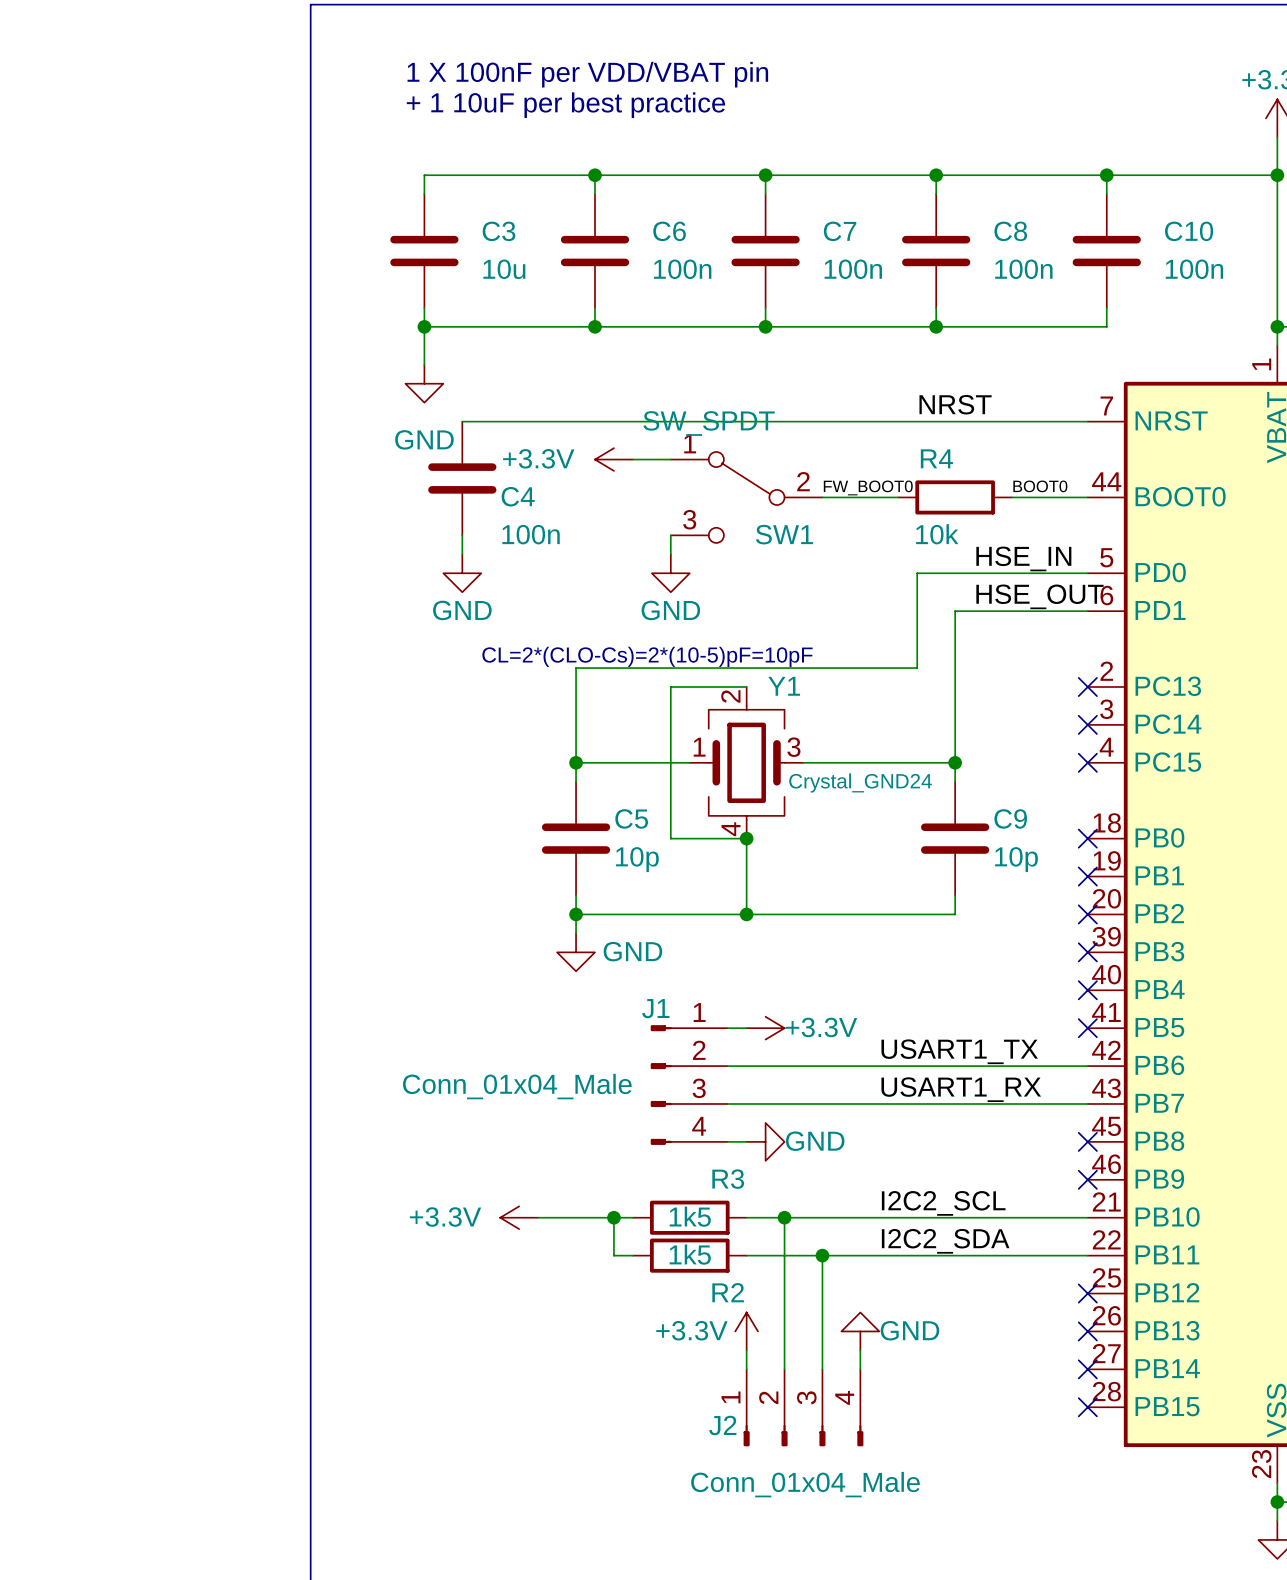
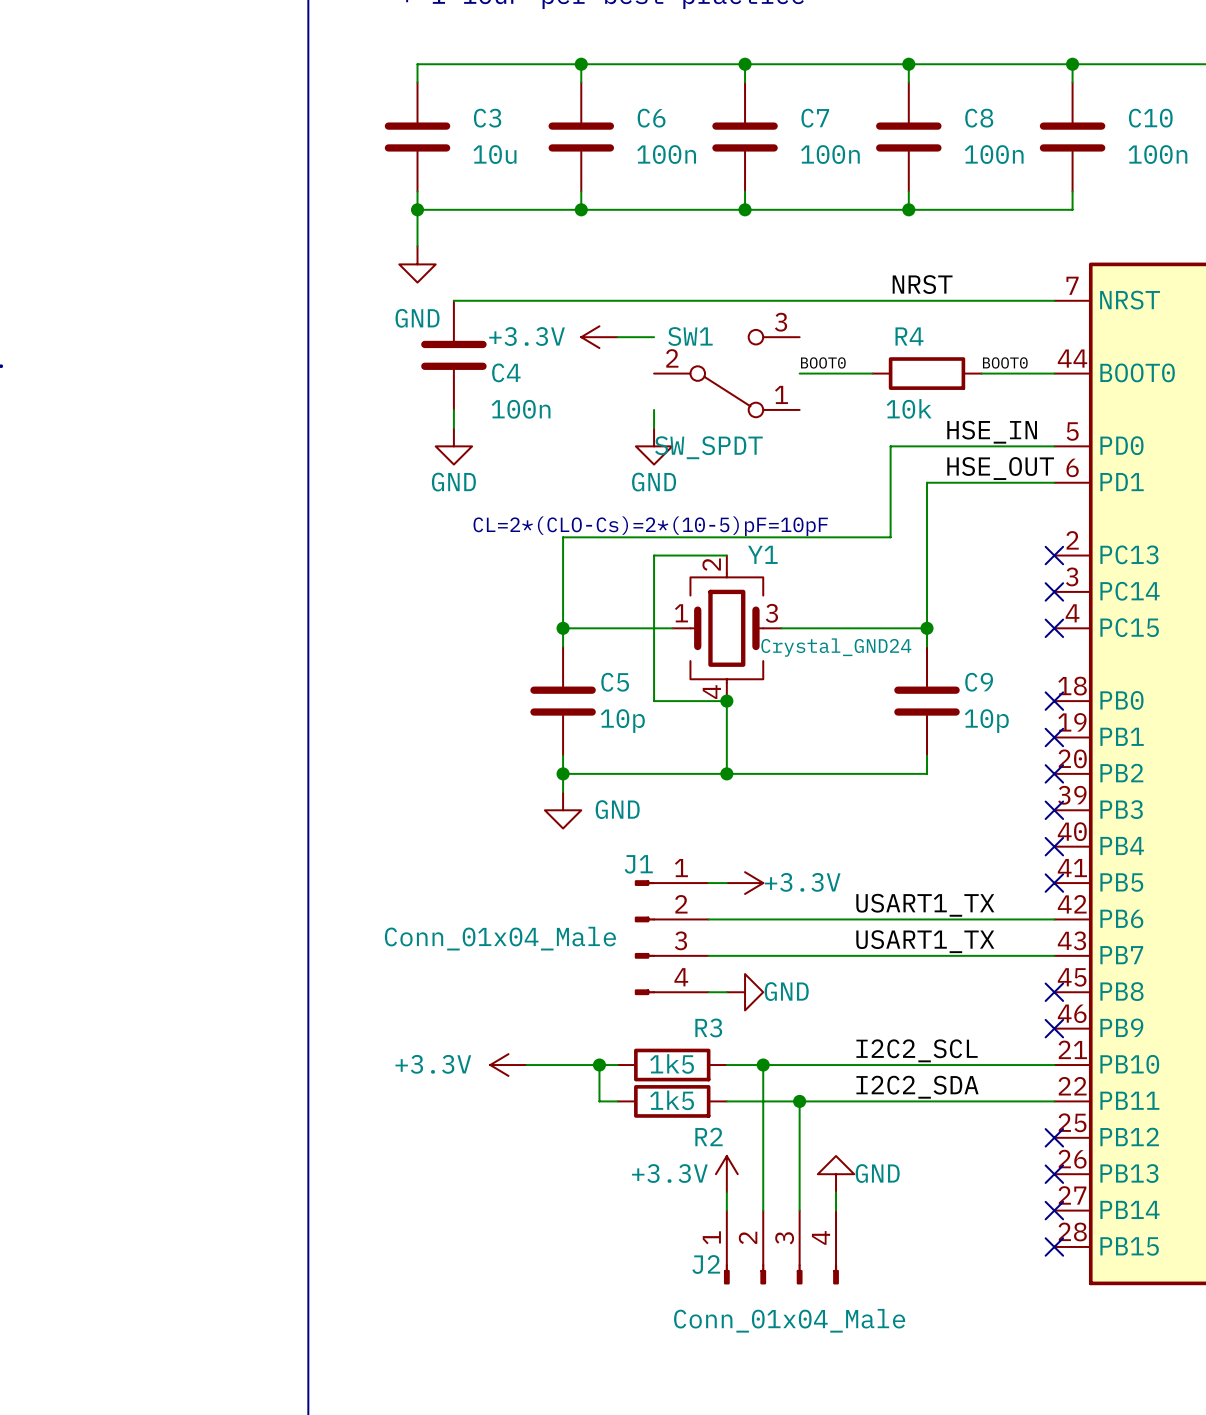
SW1 value position: SW_SPDT (709, 423) -> SW_SPDT (708, 447)
label: FW_BOOT0 (868, 487) -> BOOT0 (823, 362)
SW1 rotation: 0° (746, 497) -> 180° (726, 373)
label: USART1_RX (961, 1089) -> USART1_TX (925, 941)

